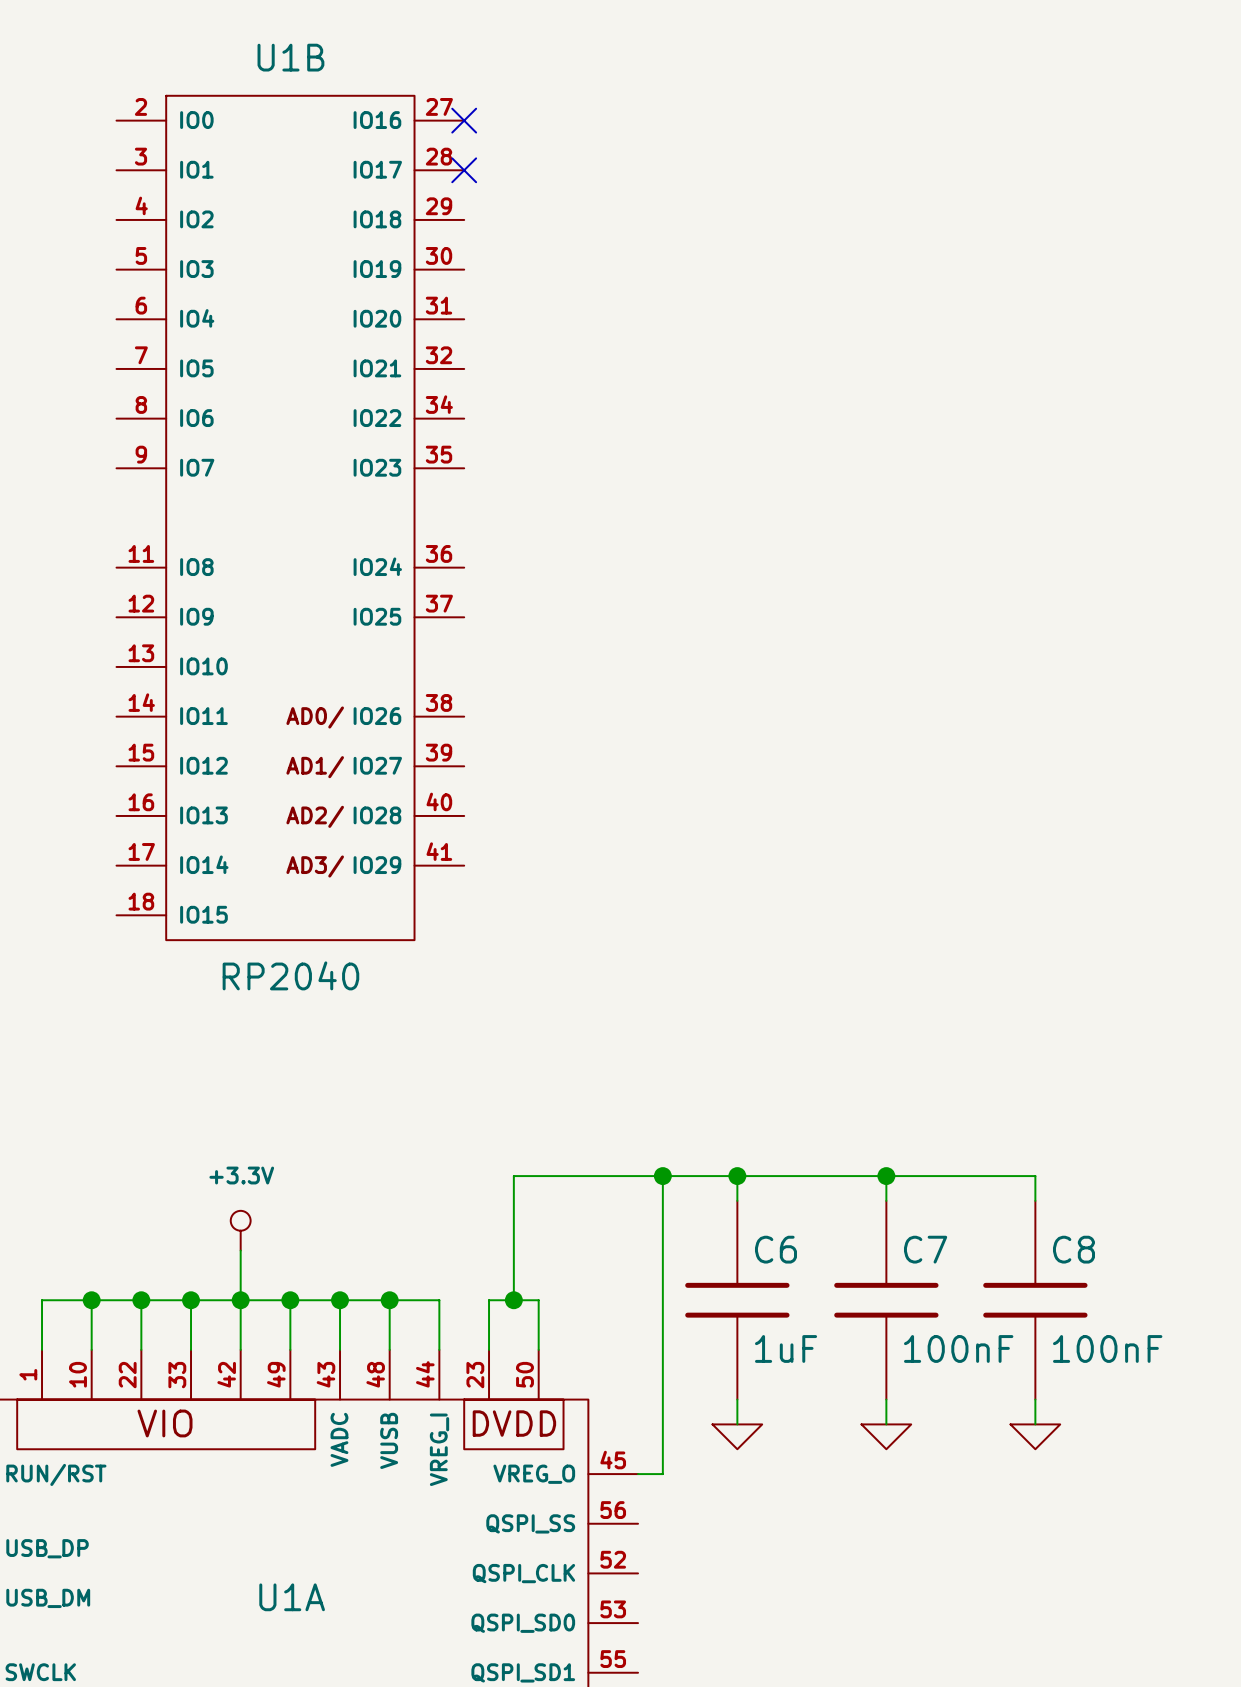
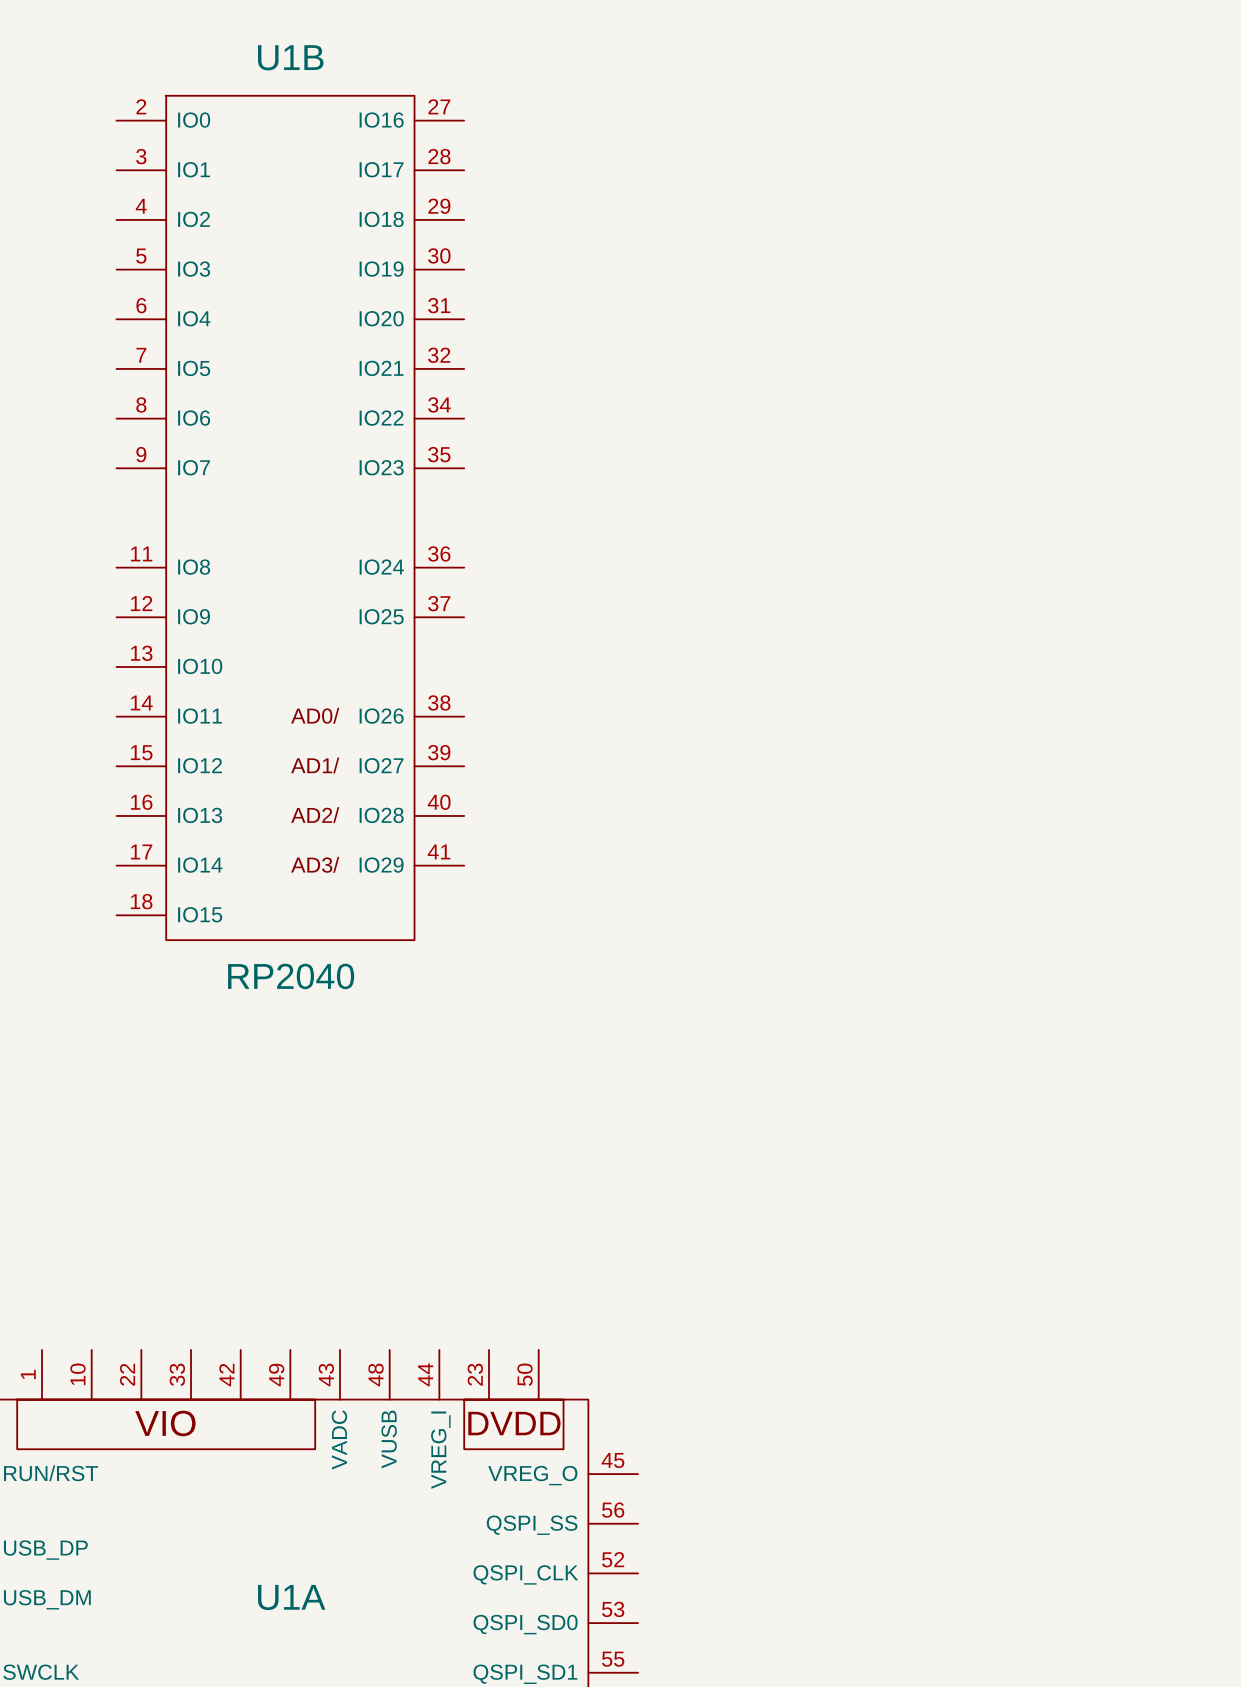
no-connect mark: (464, 120) -> none
no-connect mark: (464, 170) -> none
wire: (662, 1176) (662, 1474) (638, 1474) -> none
junction: (662, 1176) -> none
wire: (737, 1176) (737, 1200) -> none
junction: (737, 1176) -> none
wire: (886, 1176) (886, 1200) -> none
junction: (886, 1176) -> none
wire: (1035, 1200) (1035, 1176) (513, 1176) (513, 1300) -> none
power symbol: +3.3V (240, 1230) -> none
wire: (240, 1250) (240, 1349) -> none
wire: (91, 1300) (91, 1349) -> none
junction: (91, 1300) -> none
wire: (141, 1300) (141, 1349) -> none
junction: (141, 1300) -> none
wire: (191, 1300) (191, 1349) -> none
junction: (191, 1300) -> none
junction: (240, 1300) -> none
wire: (290, 1300) (290, 1349) -> none
junction: (290, 1300) -> none
wire: (340, 1300) (340, 1349) -> none
junction: (340, 1300) -> none
wire: (389, 1300) (389, 1349) -> none
junction: (389, 1300) -> none
junction: (513, 1300) -> none
C6: 1uF (737, 1300) -> none
C7: 100nF (886, 1300) -> none
C8: 100nF (1035, 1300) -> none
wire: (42, 1349) (42, 1300) (439, 1300) (439, 1349) -> none
wire: (489, 1349) (489, 1300) (538, 1300) (538, 1349) -> none
wire: (737, 1399) (737, 1424) -> none
wire: (886, 1399) (886, 1424) -> none
wire: (1035, 1399) (1035, 1424) -> none
power symbol: (737, 1436) -> none
power symbol: (886, 1436) -> none
power symbol: (1035, 1436) -> none

